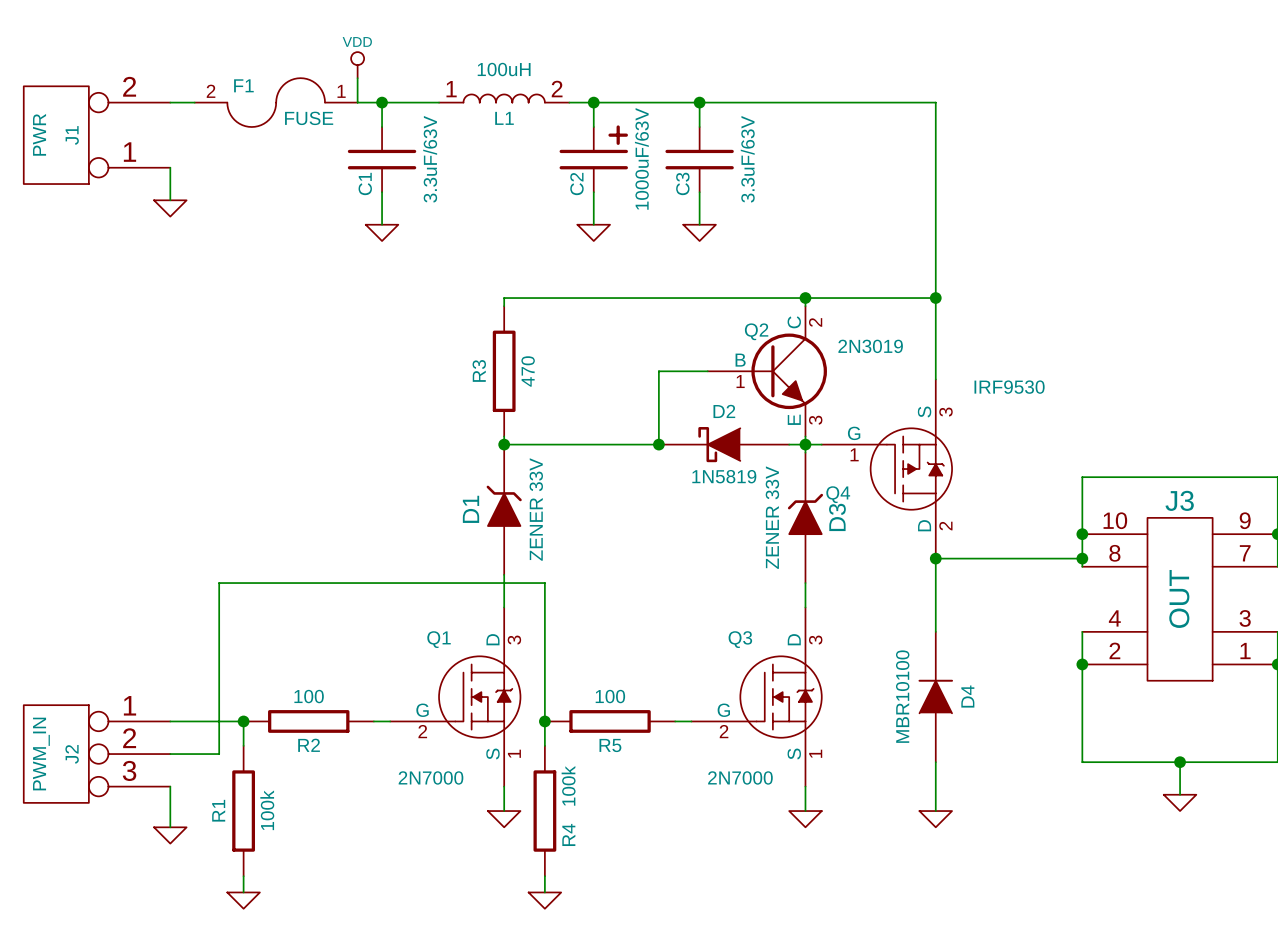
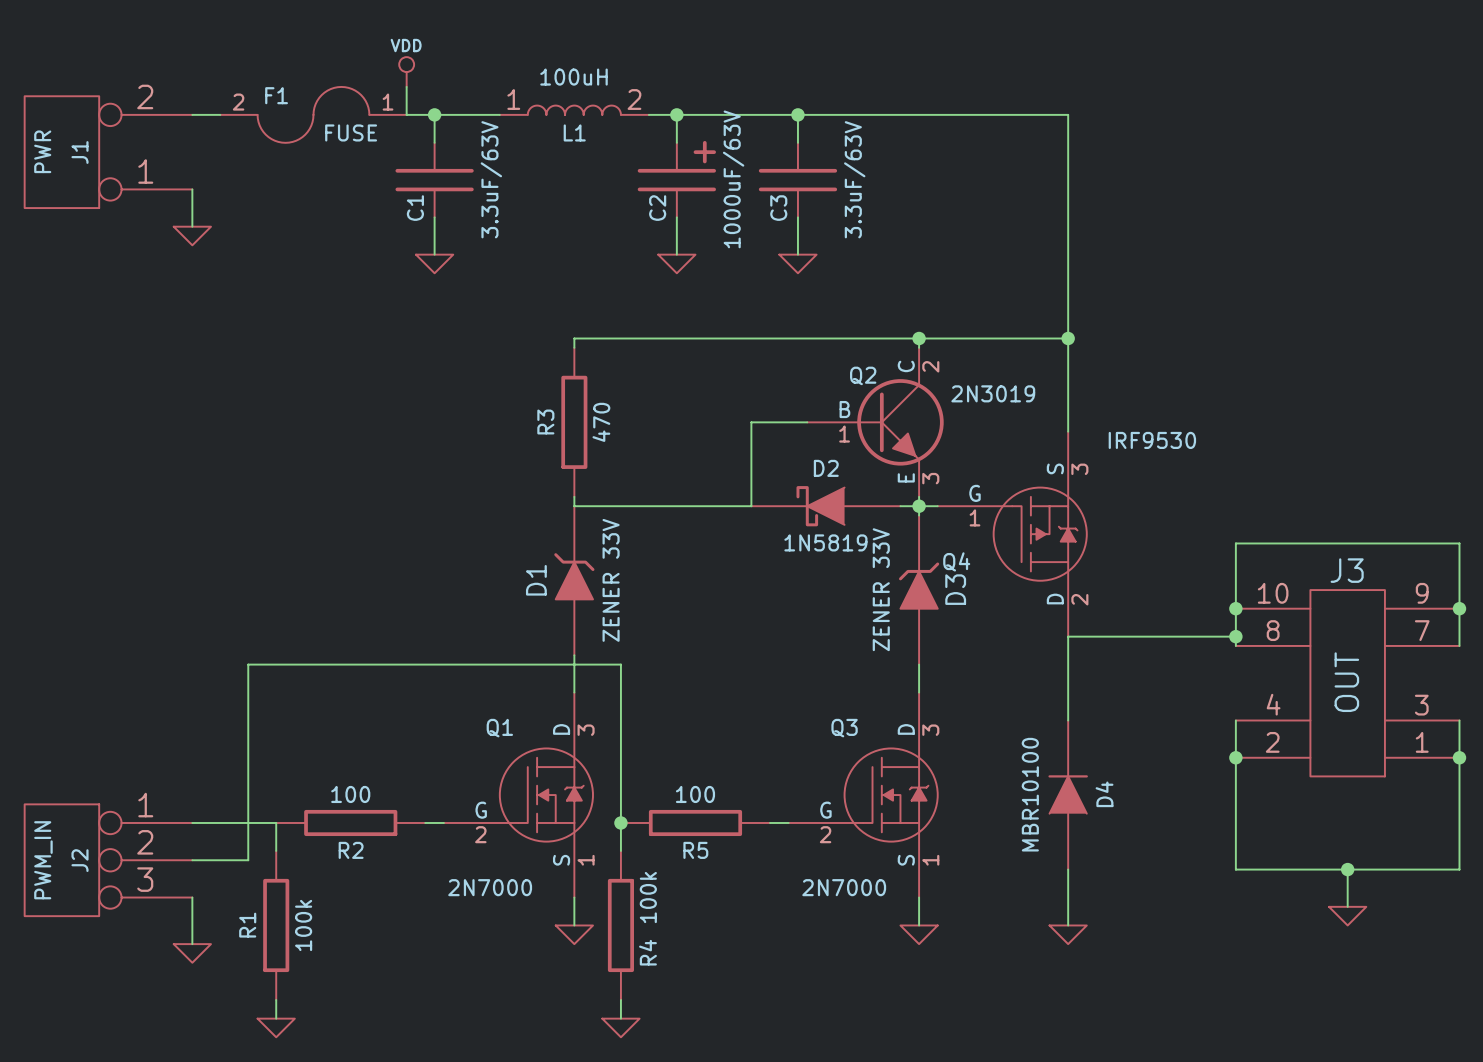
junction: (504, 444) -> none
junction: (658, 444) -> none
junction: (935, 558) -> none
junction: (243, 721) -> none

